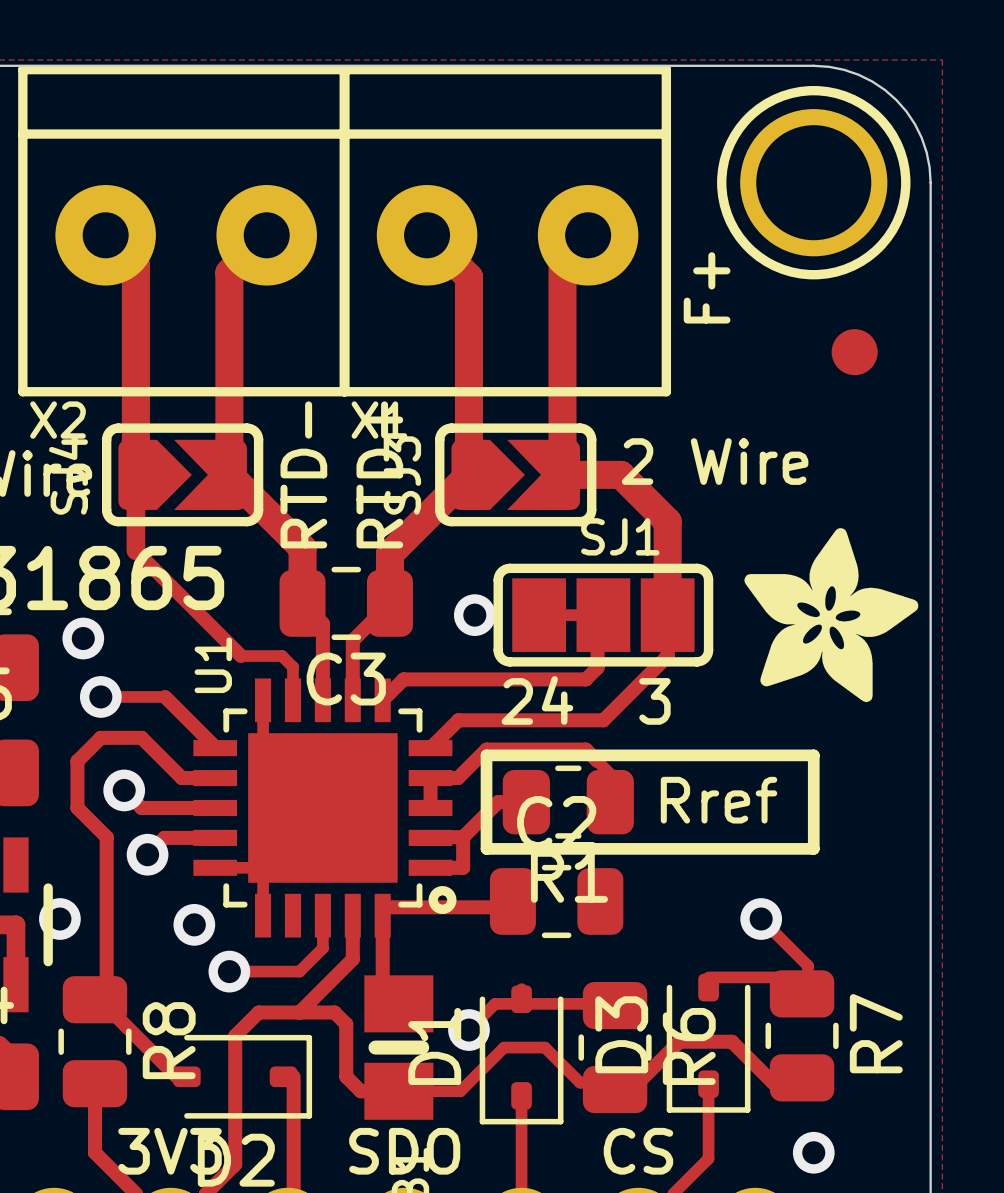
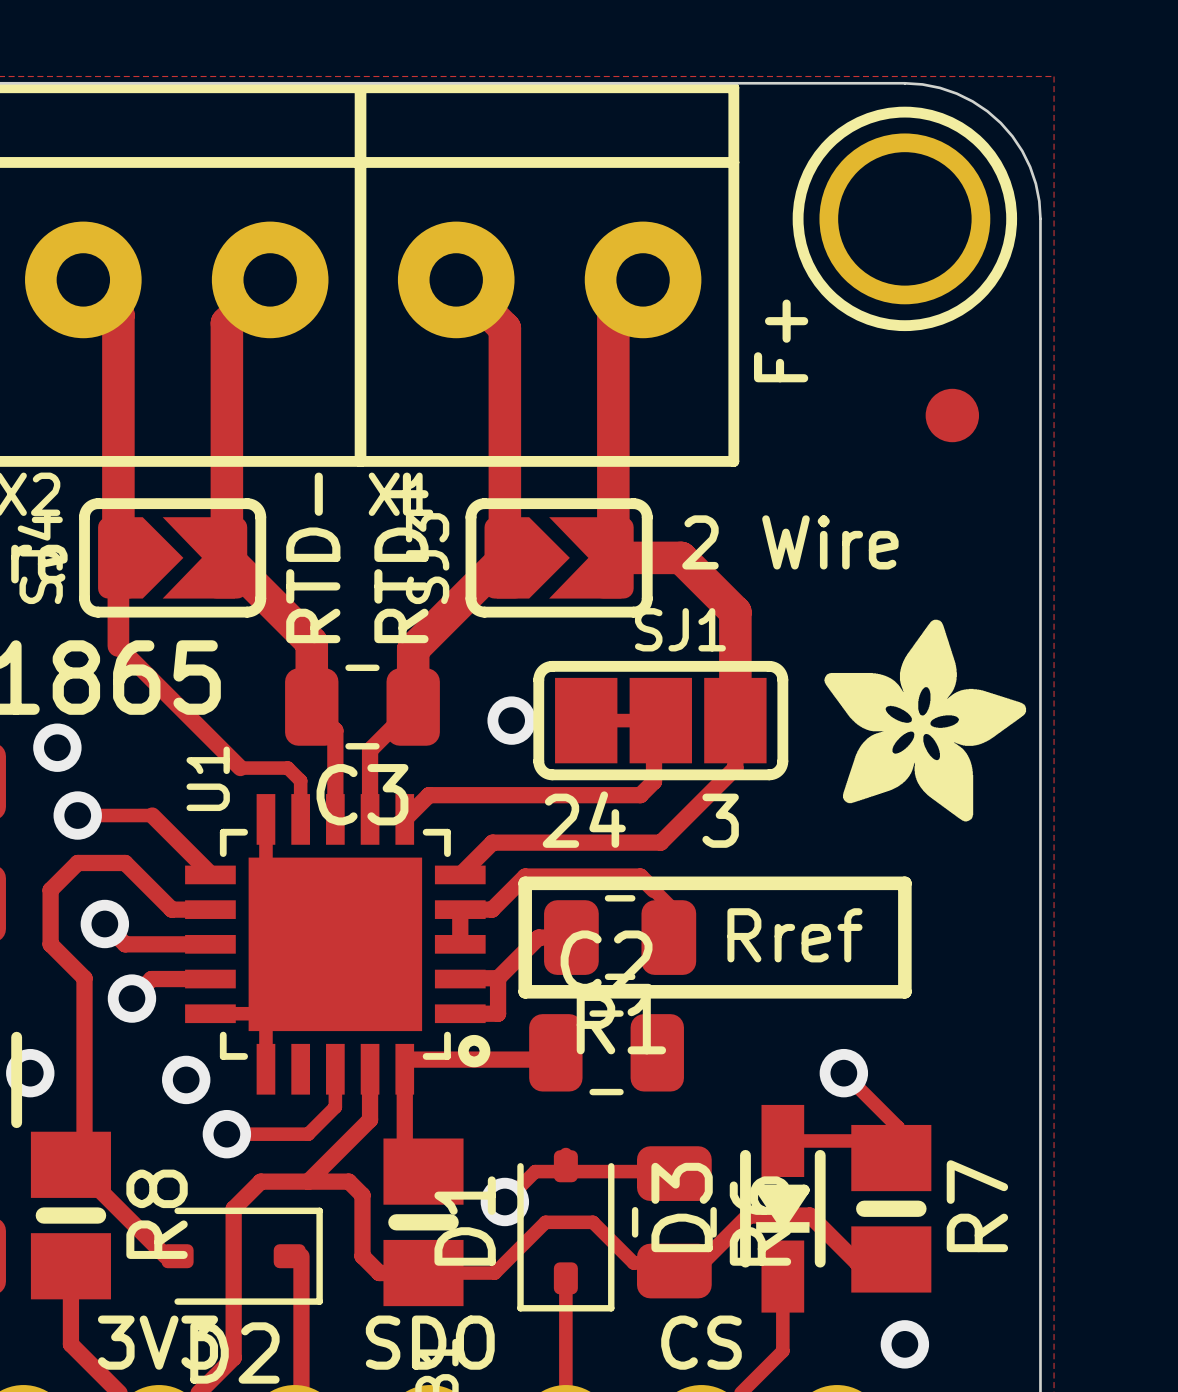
R7 footprint: [765, 970, 839, 1102] -> [851, 1124, 932, 1293]
D3 footprint: [666, 973, 751, 1113] -> [740, 1104, 826, 1313]
R8 footprint: [58, 976, 132, 1108] -> [30, 1131, 111, 1300]

